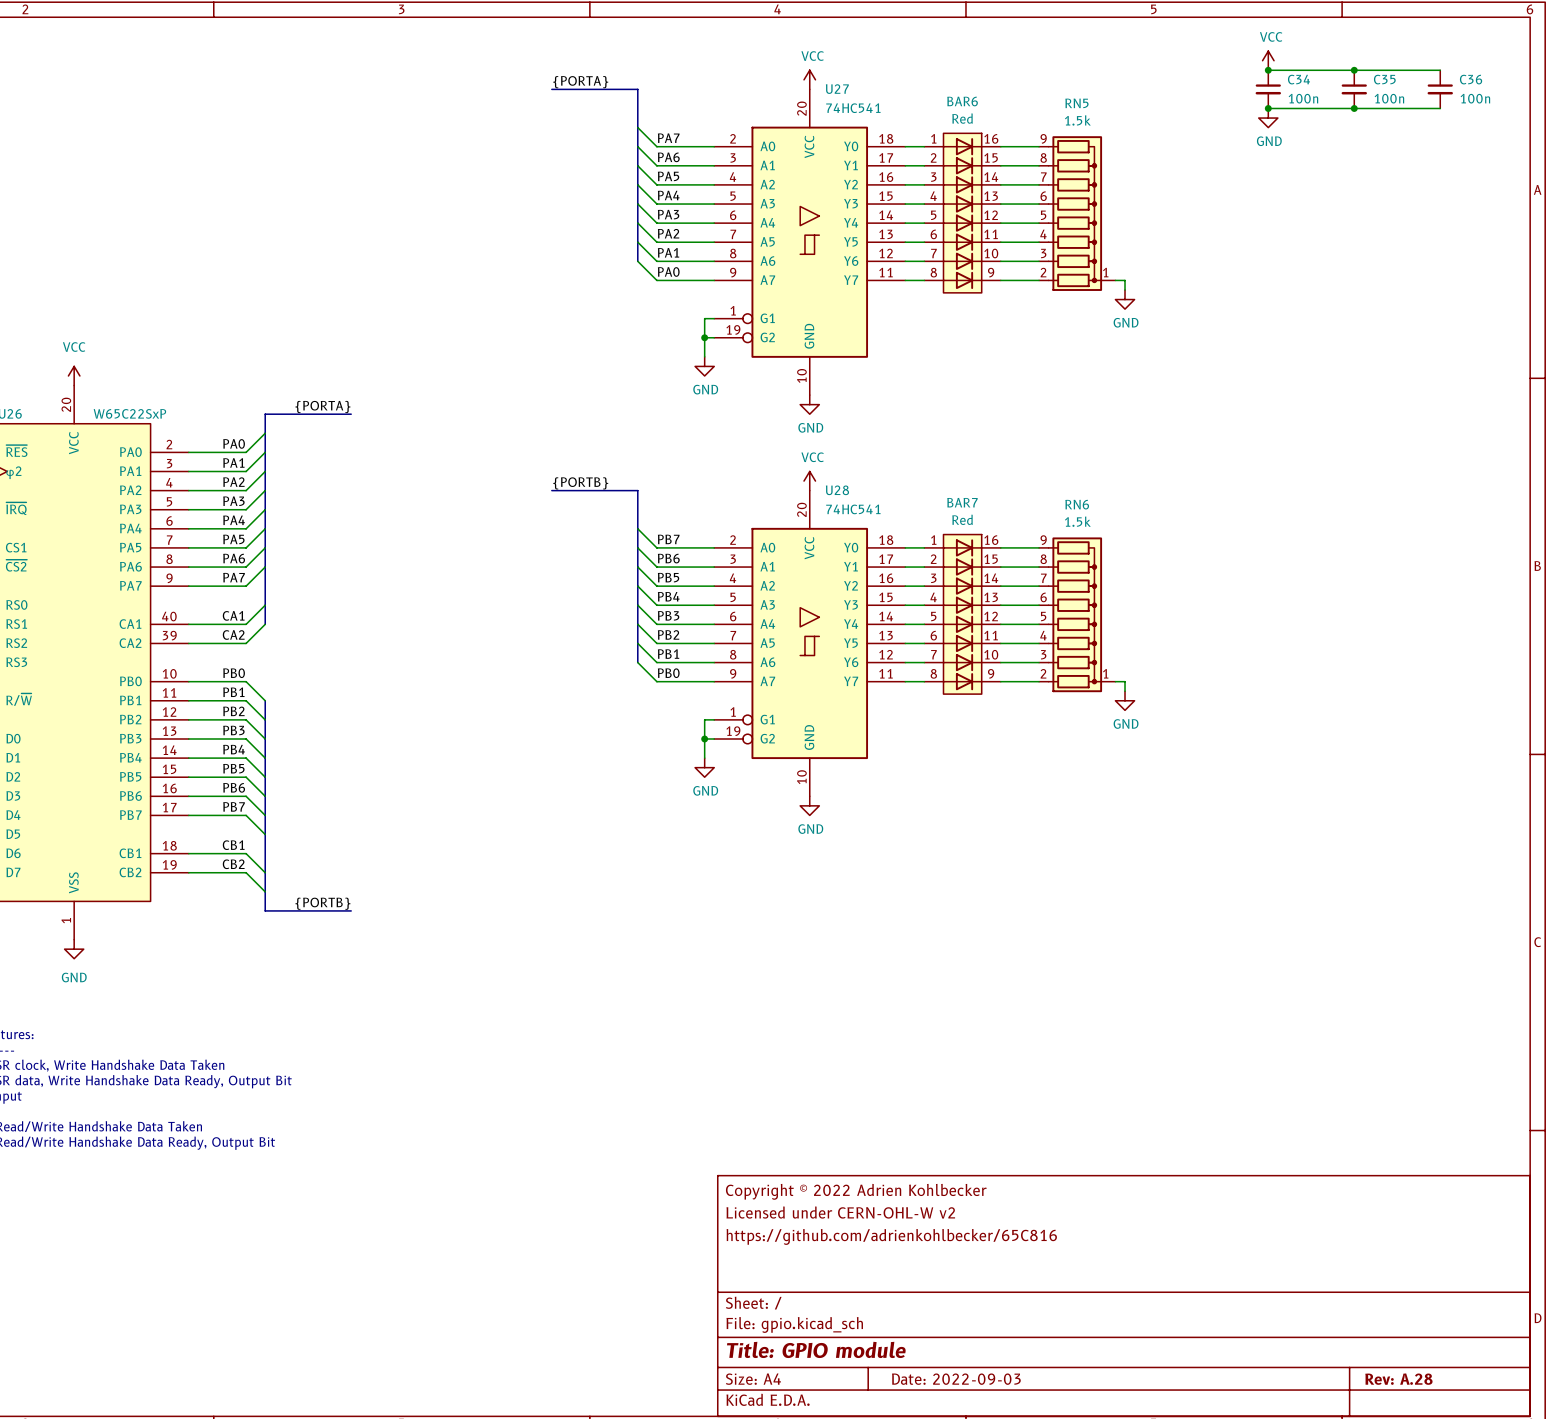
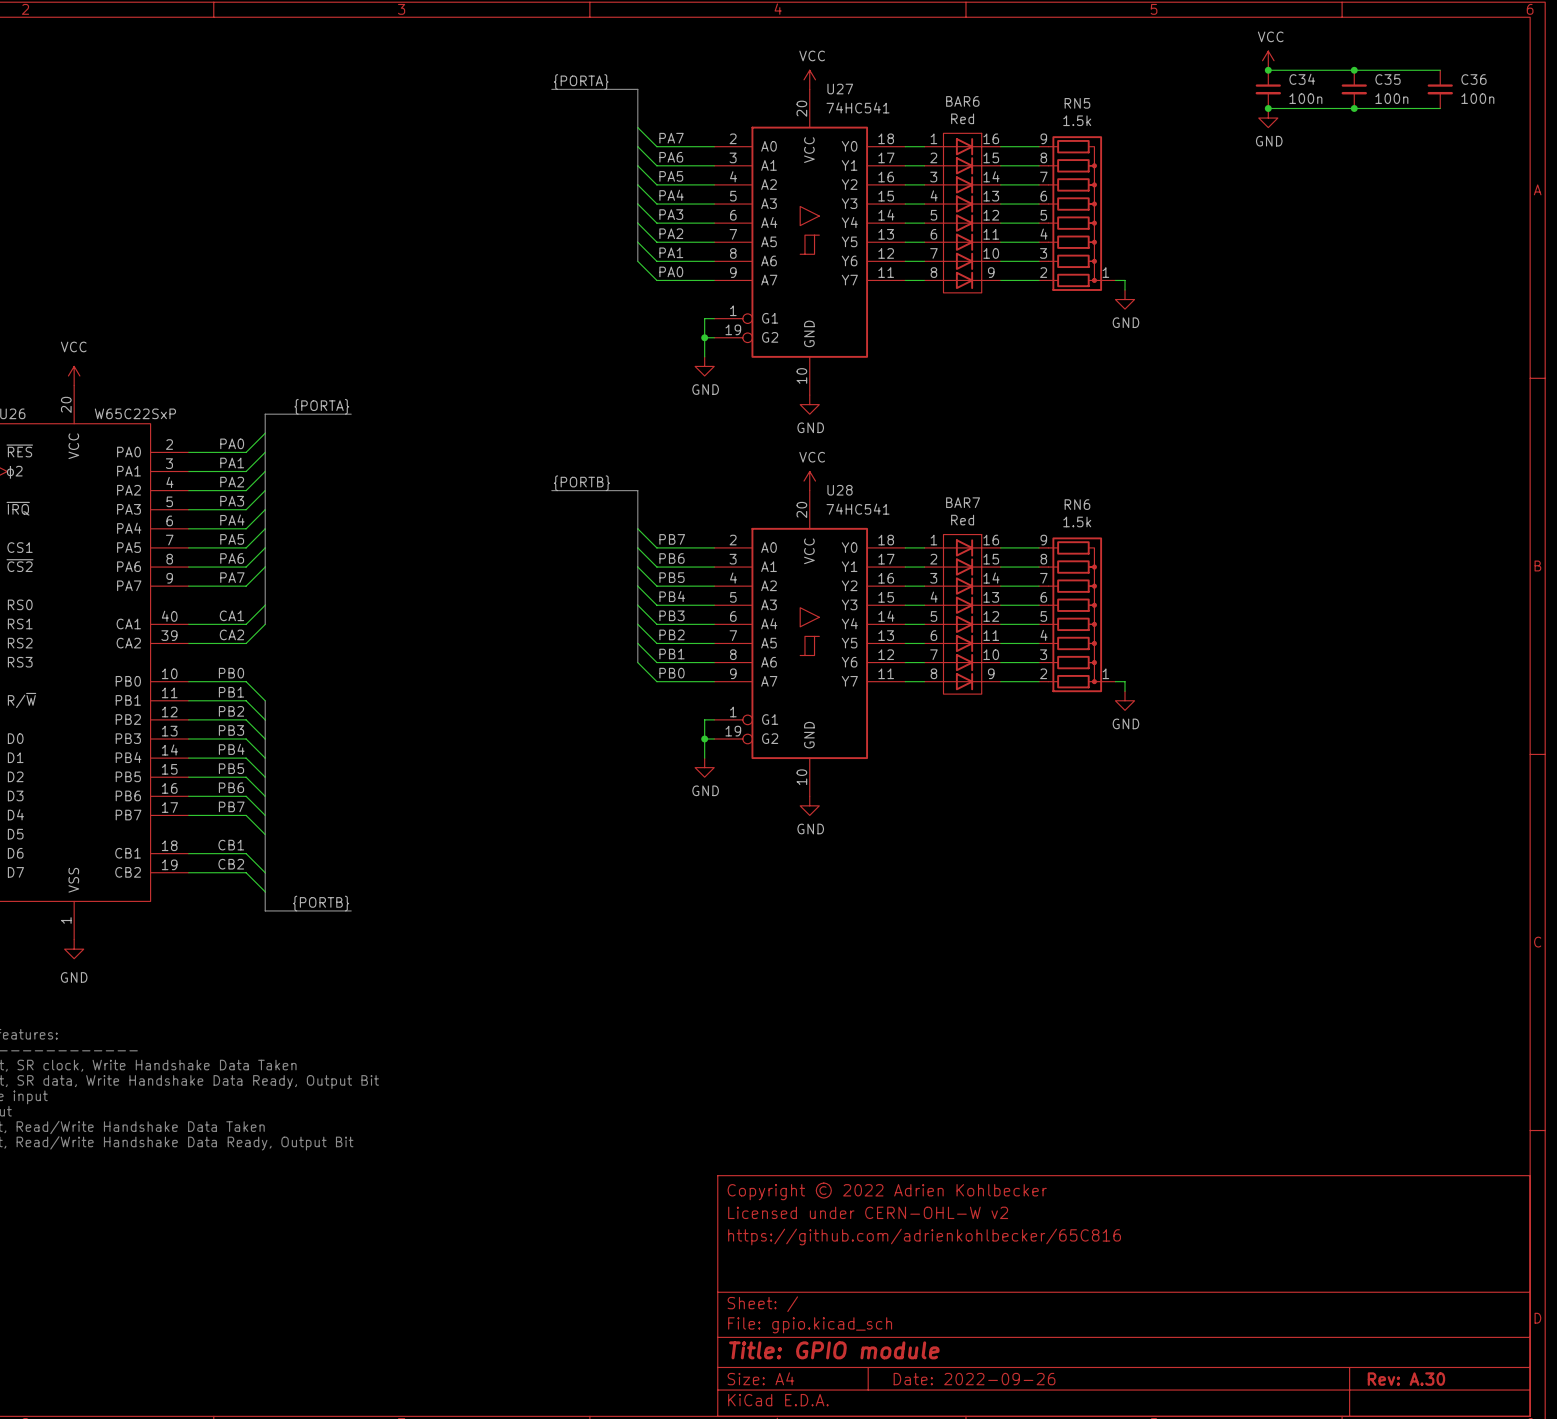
title block: Date: 2022-09-03 (956, 1379) -> Date: 2022-09-26 (974, 1379)
title block: Rev: A.28 (1398, 1379) -> Rev: A.30 (1406, 1379)

